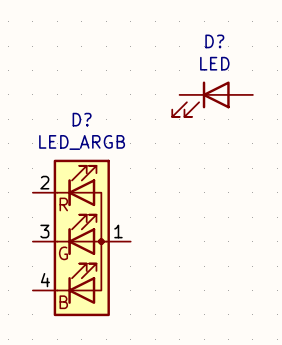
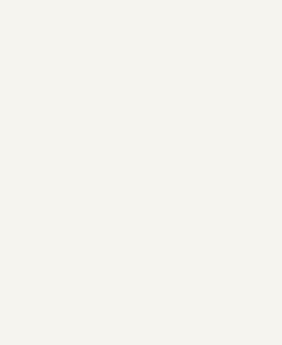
D?: LED (212, 99) -> none
D?: LED_ARGB (81, 237) -> none

